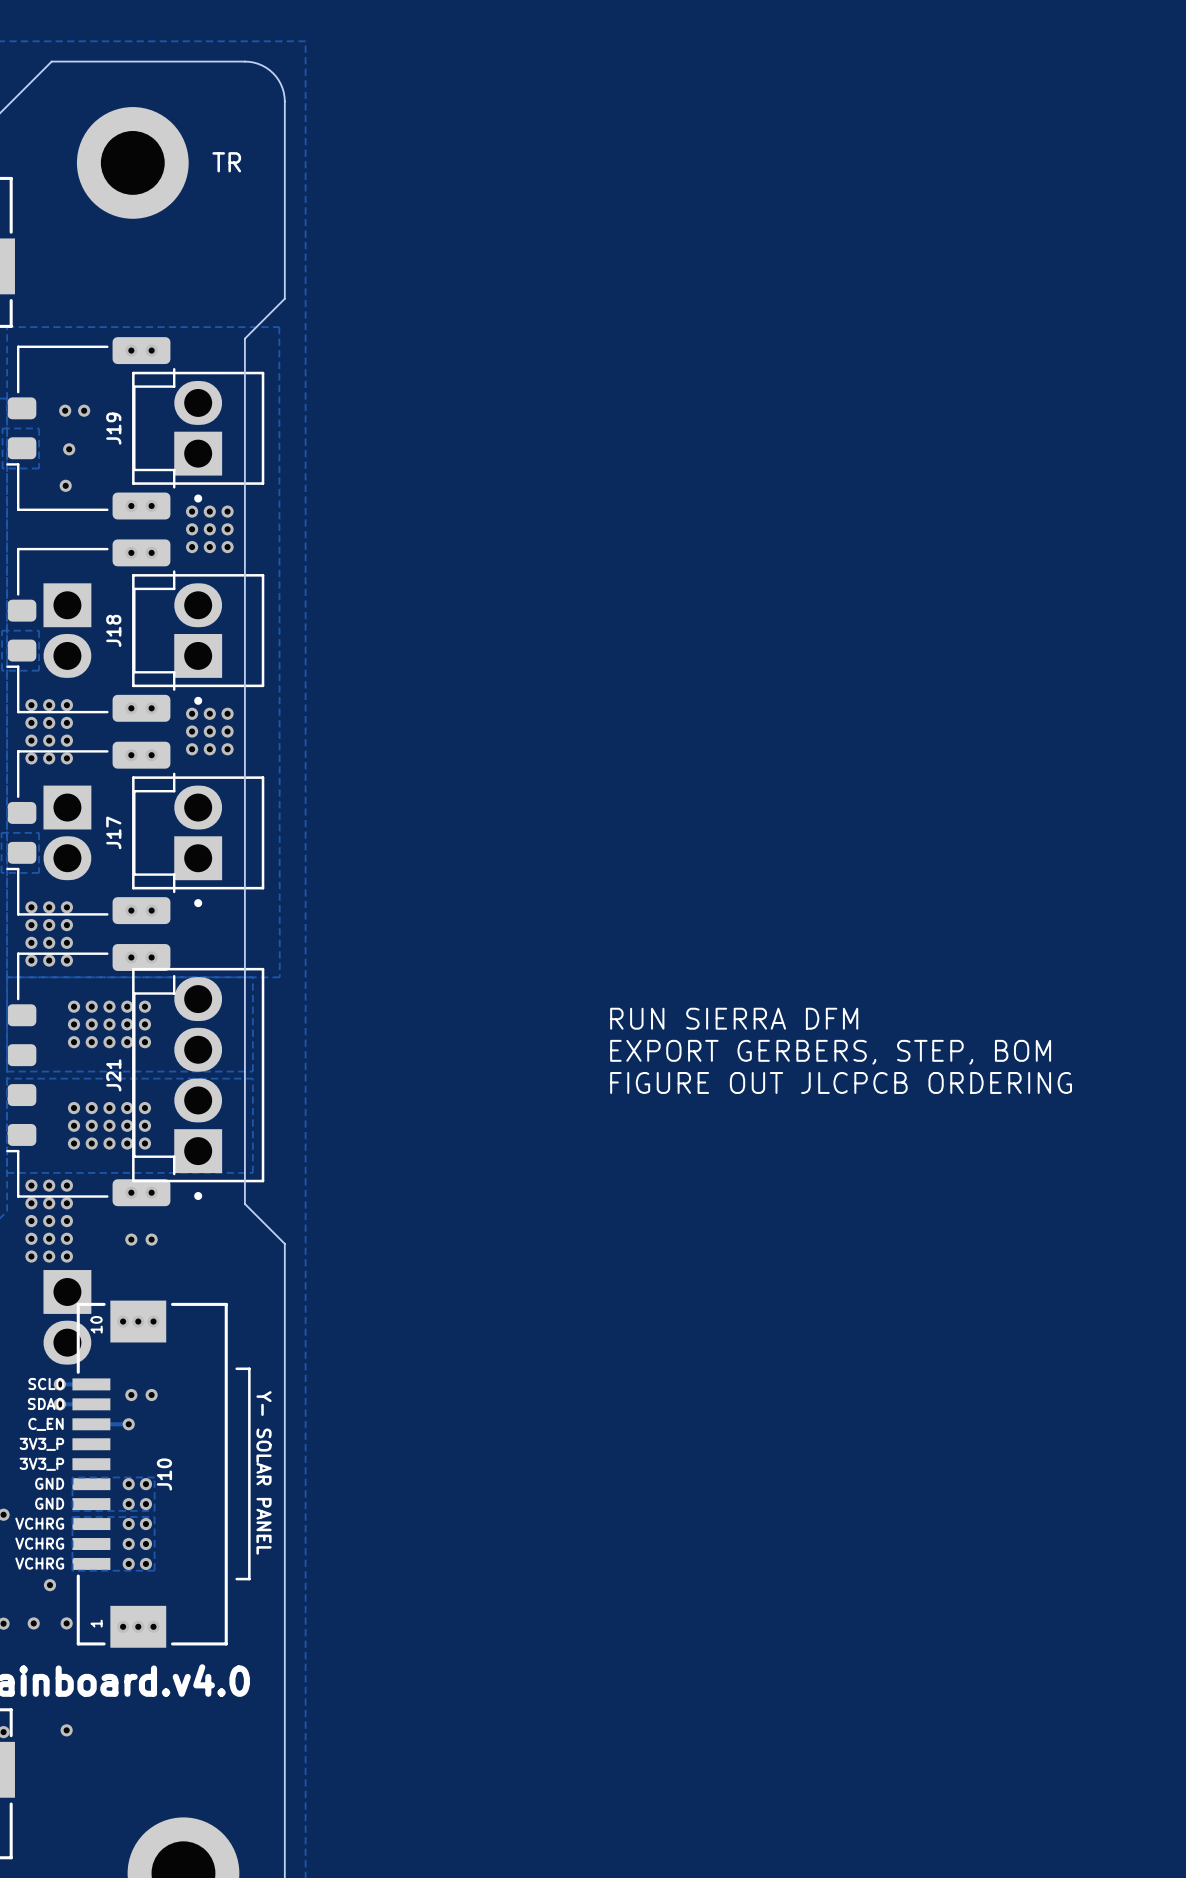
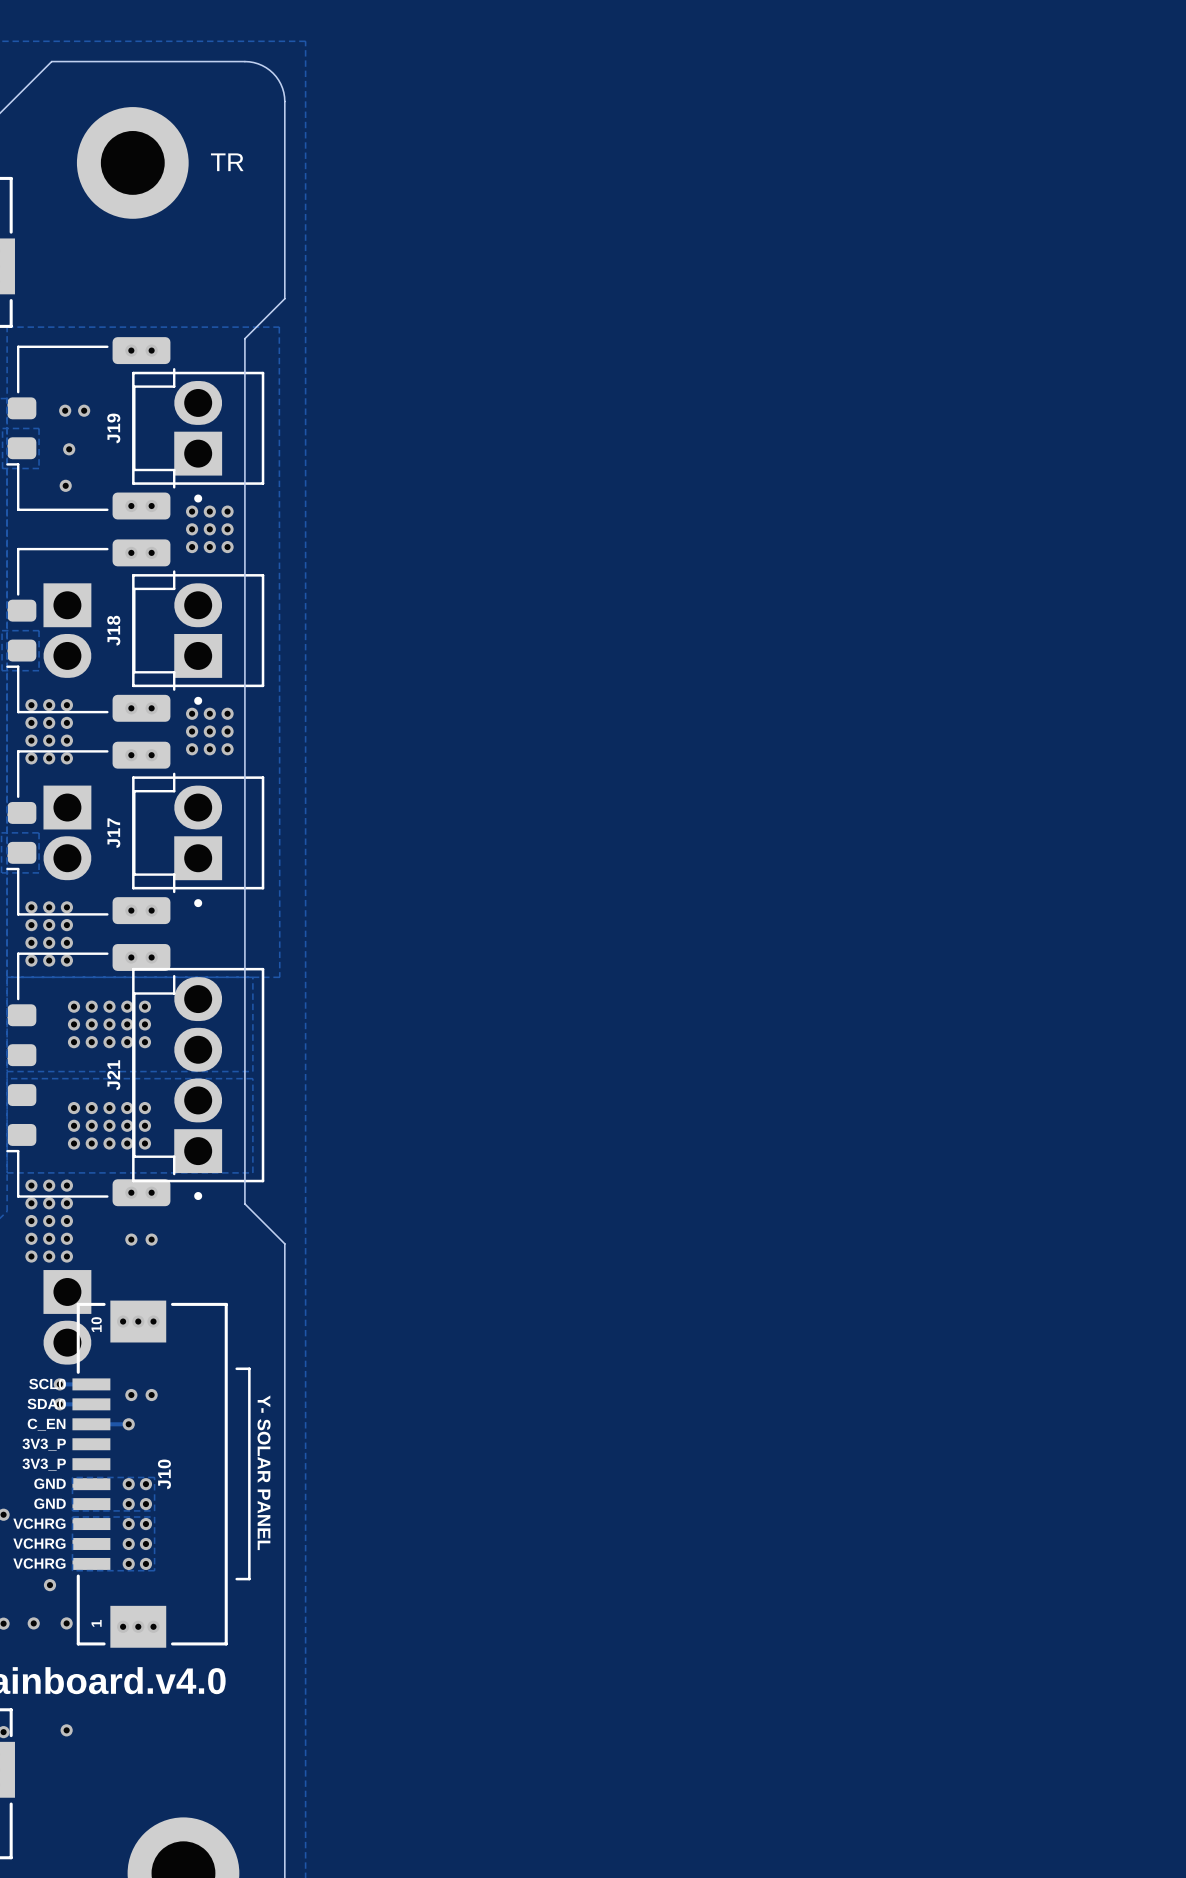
text: RUN SIERRA DFM (734, 1018) -> none
text: EXPORT GERBERS, STEP, BOM (830, 1052) -> none
text: FIGURE OUT JLCPCB ORDERING (841, 1082) -> none

